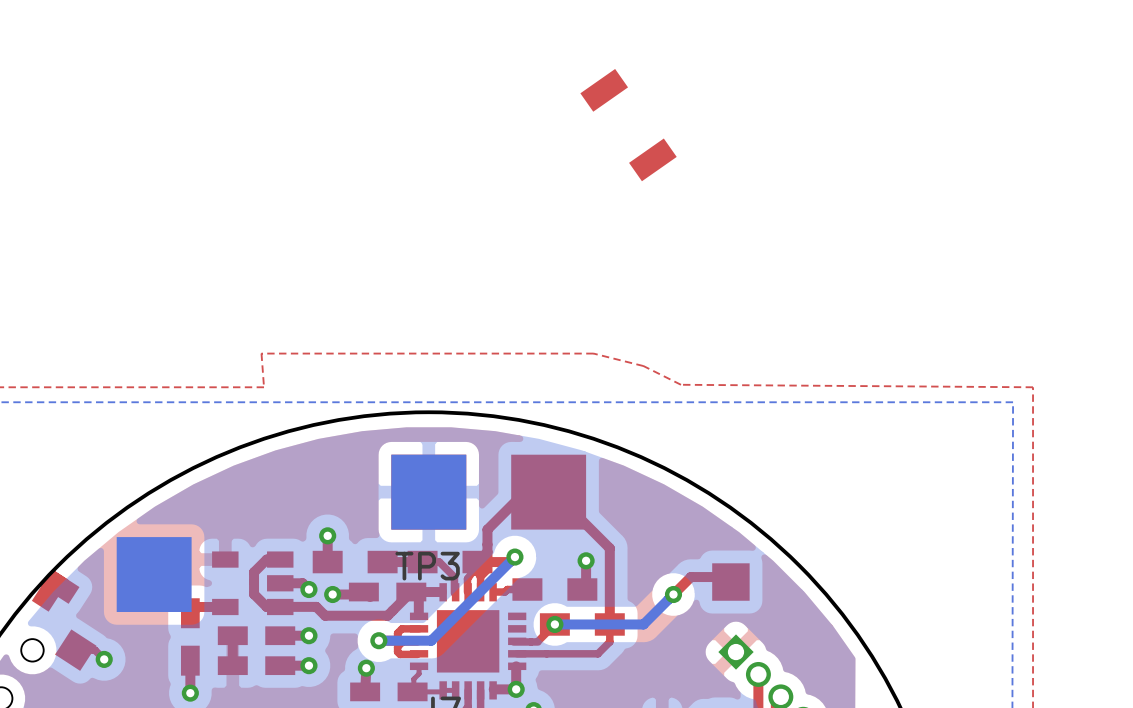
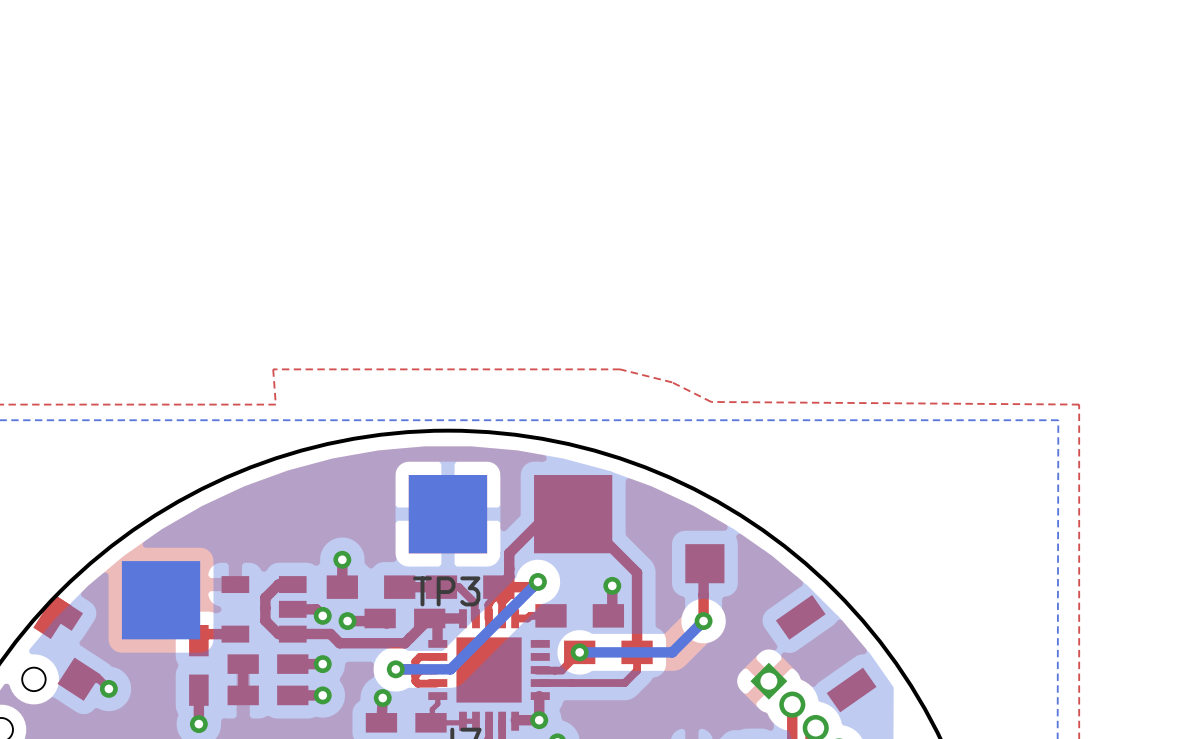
part position: (628, 125) -> (826, 653)
top track: (728, 577) (690, 577) (673, 594) -> (703, 564) (703, 621)
part position: (730, 582) -> (704, 563)

